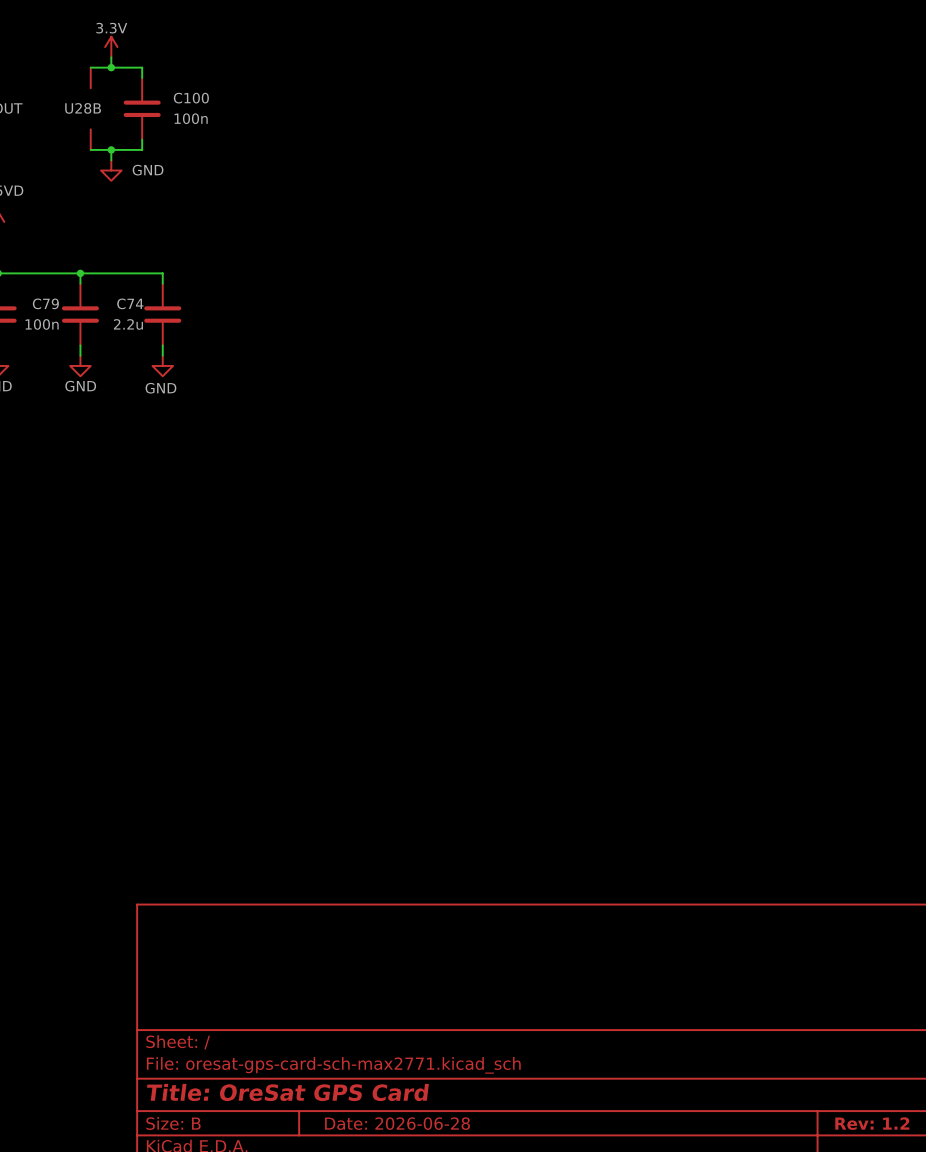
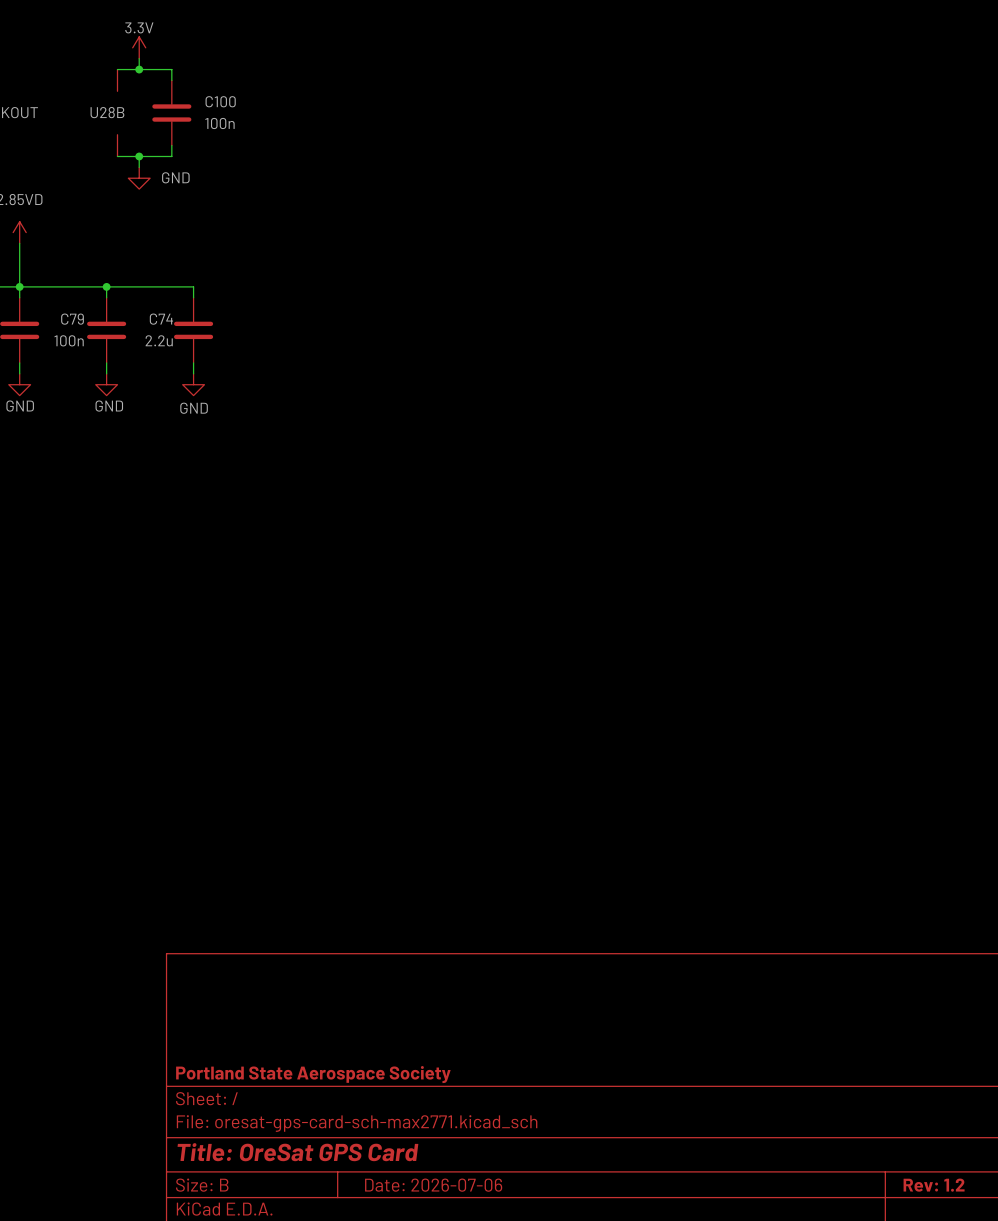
title block: none -> Portland State Aerospace Society (313, 1074)
title block: Date: 2026-06-28 (397, 1123) -> Date: 2026-07-06 (433, 1185)

